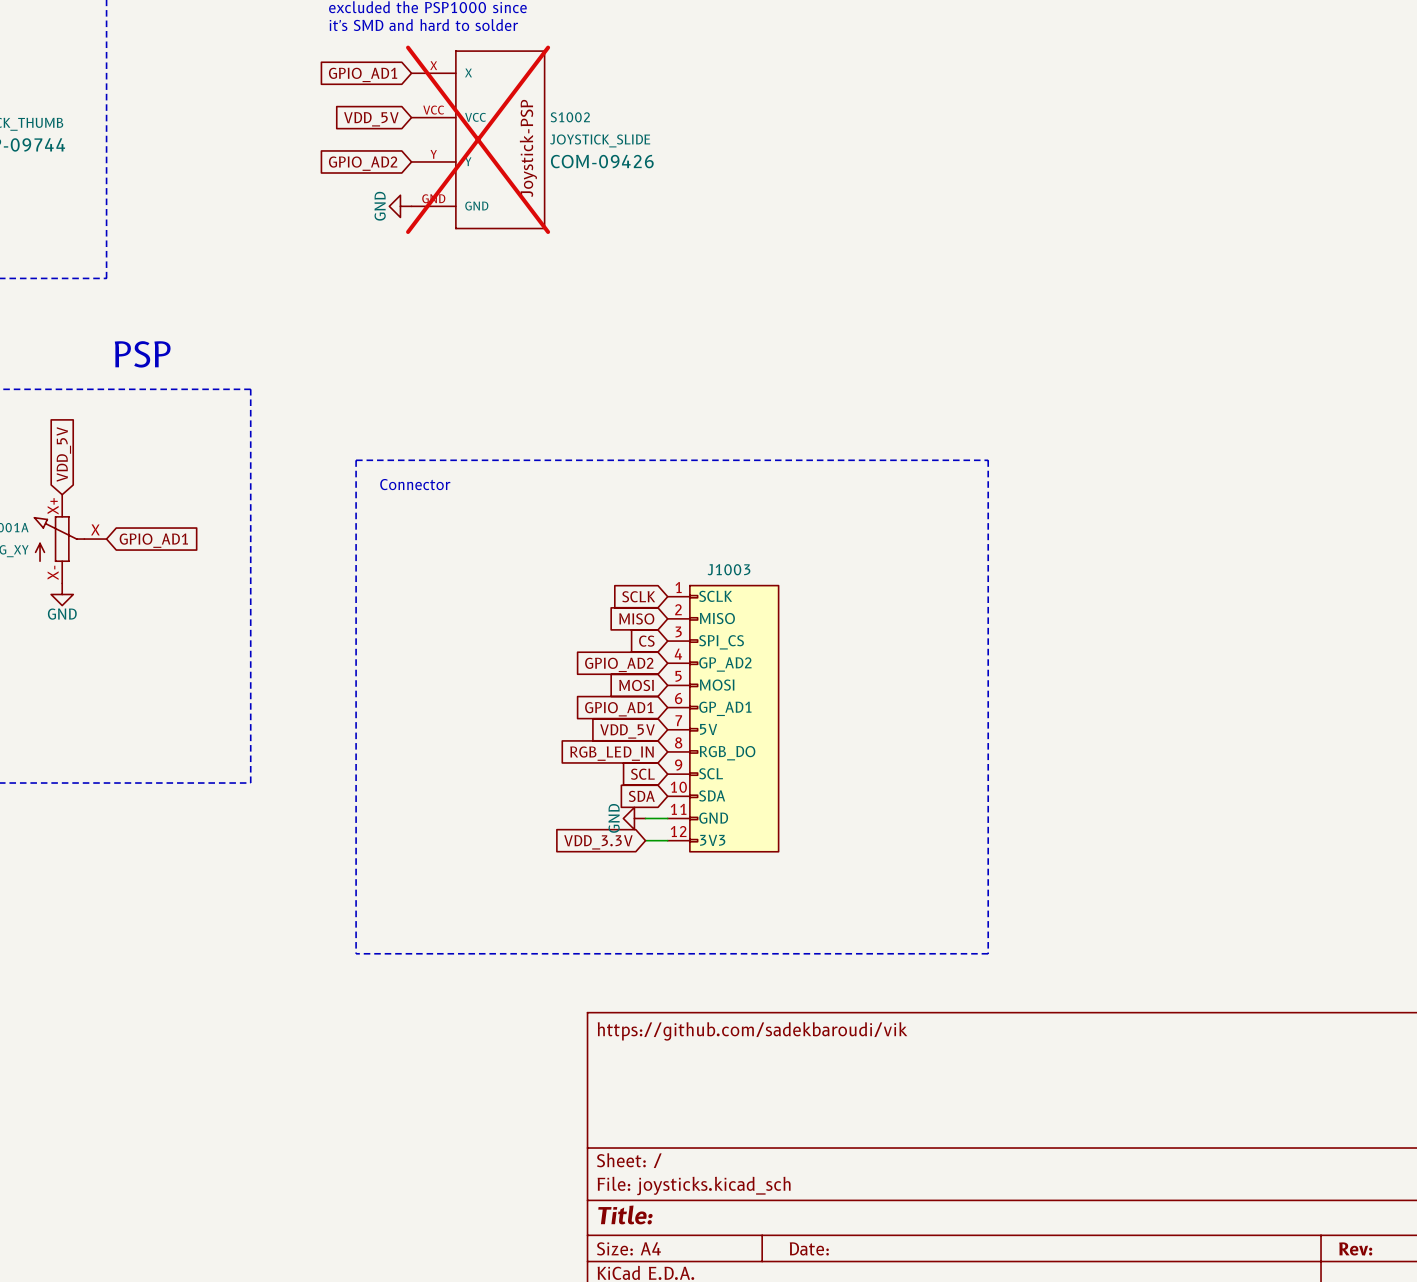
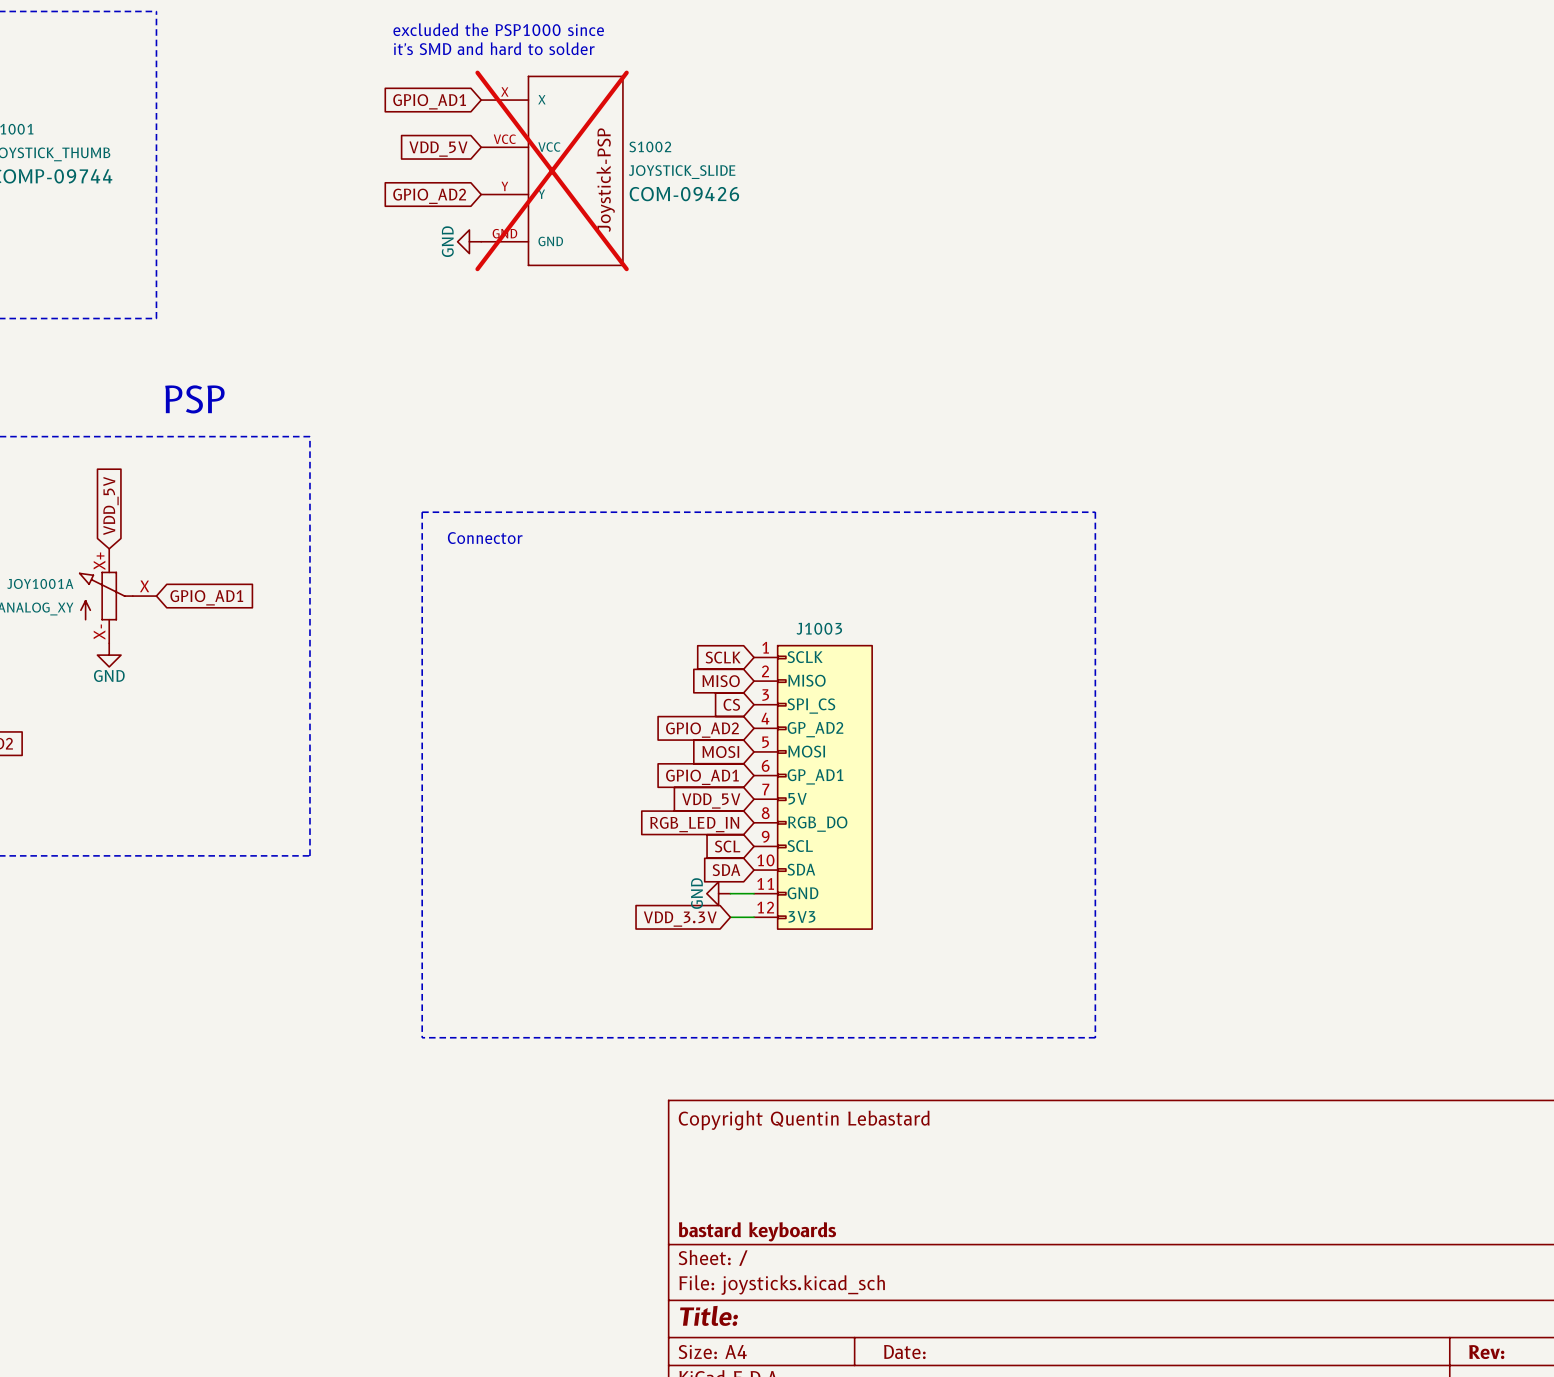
title block: https://github.com/sadekbaroudi/vik (752, 1031) -> Copyright Quentin Lebastard (804, 1120)
title block: none -> bastard keyboards (757, 1231)

